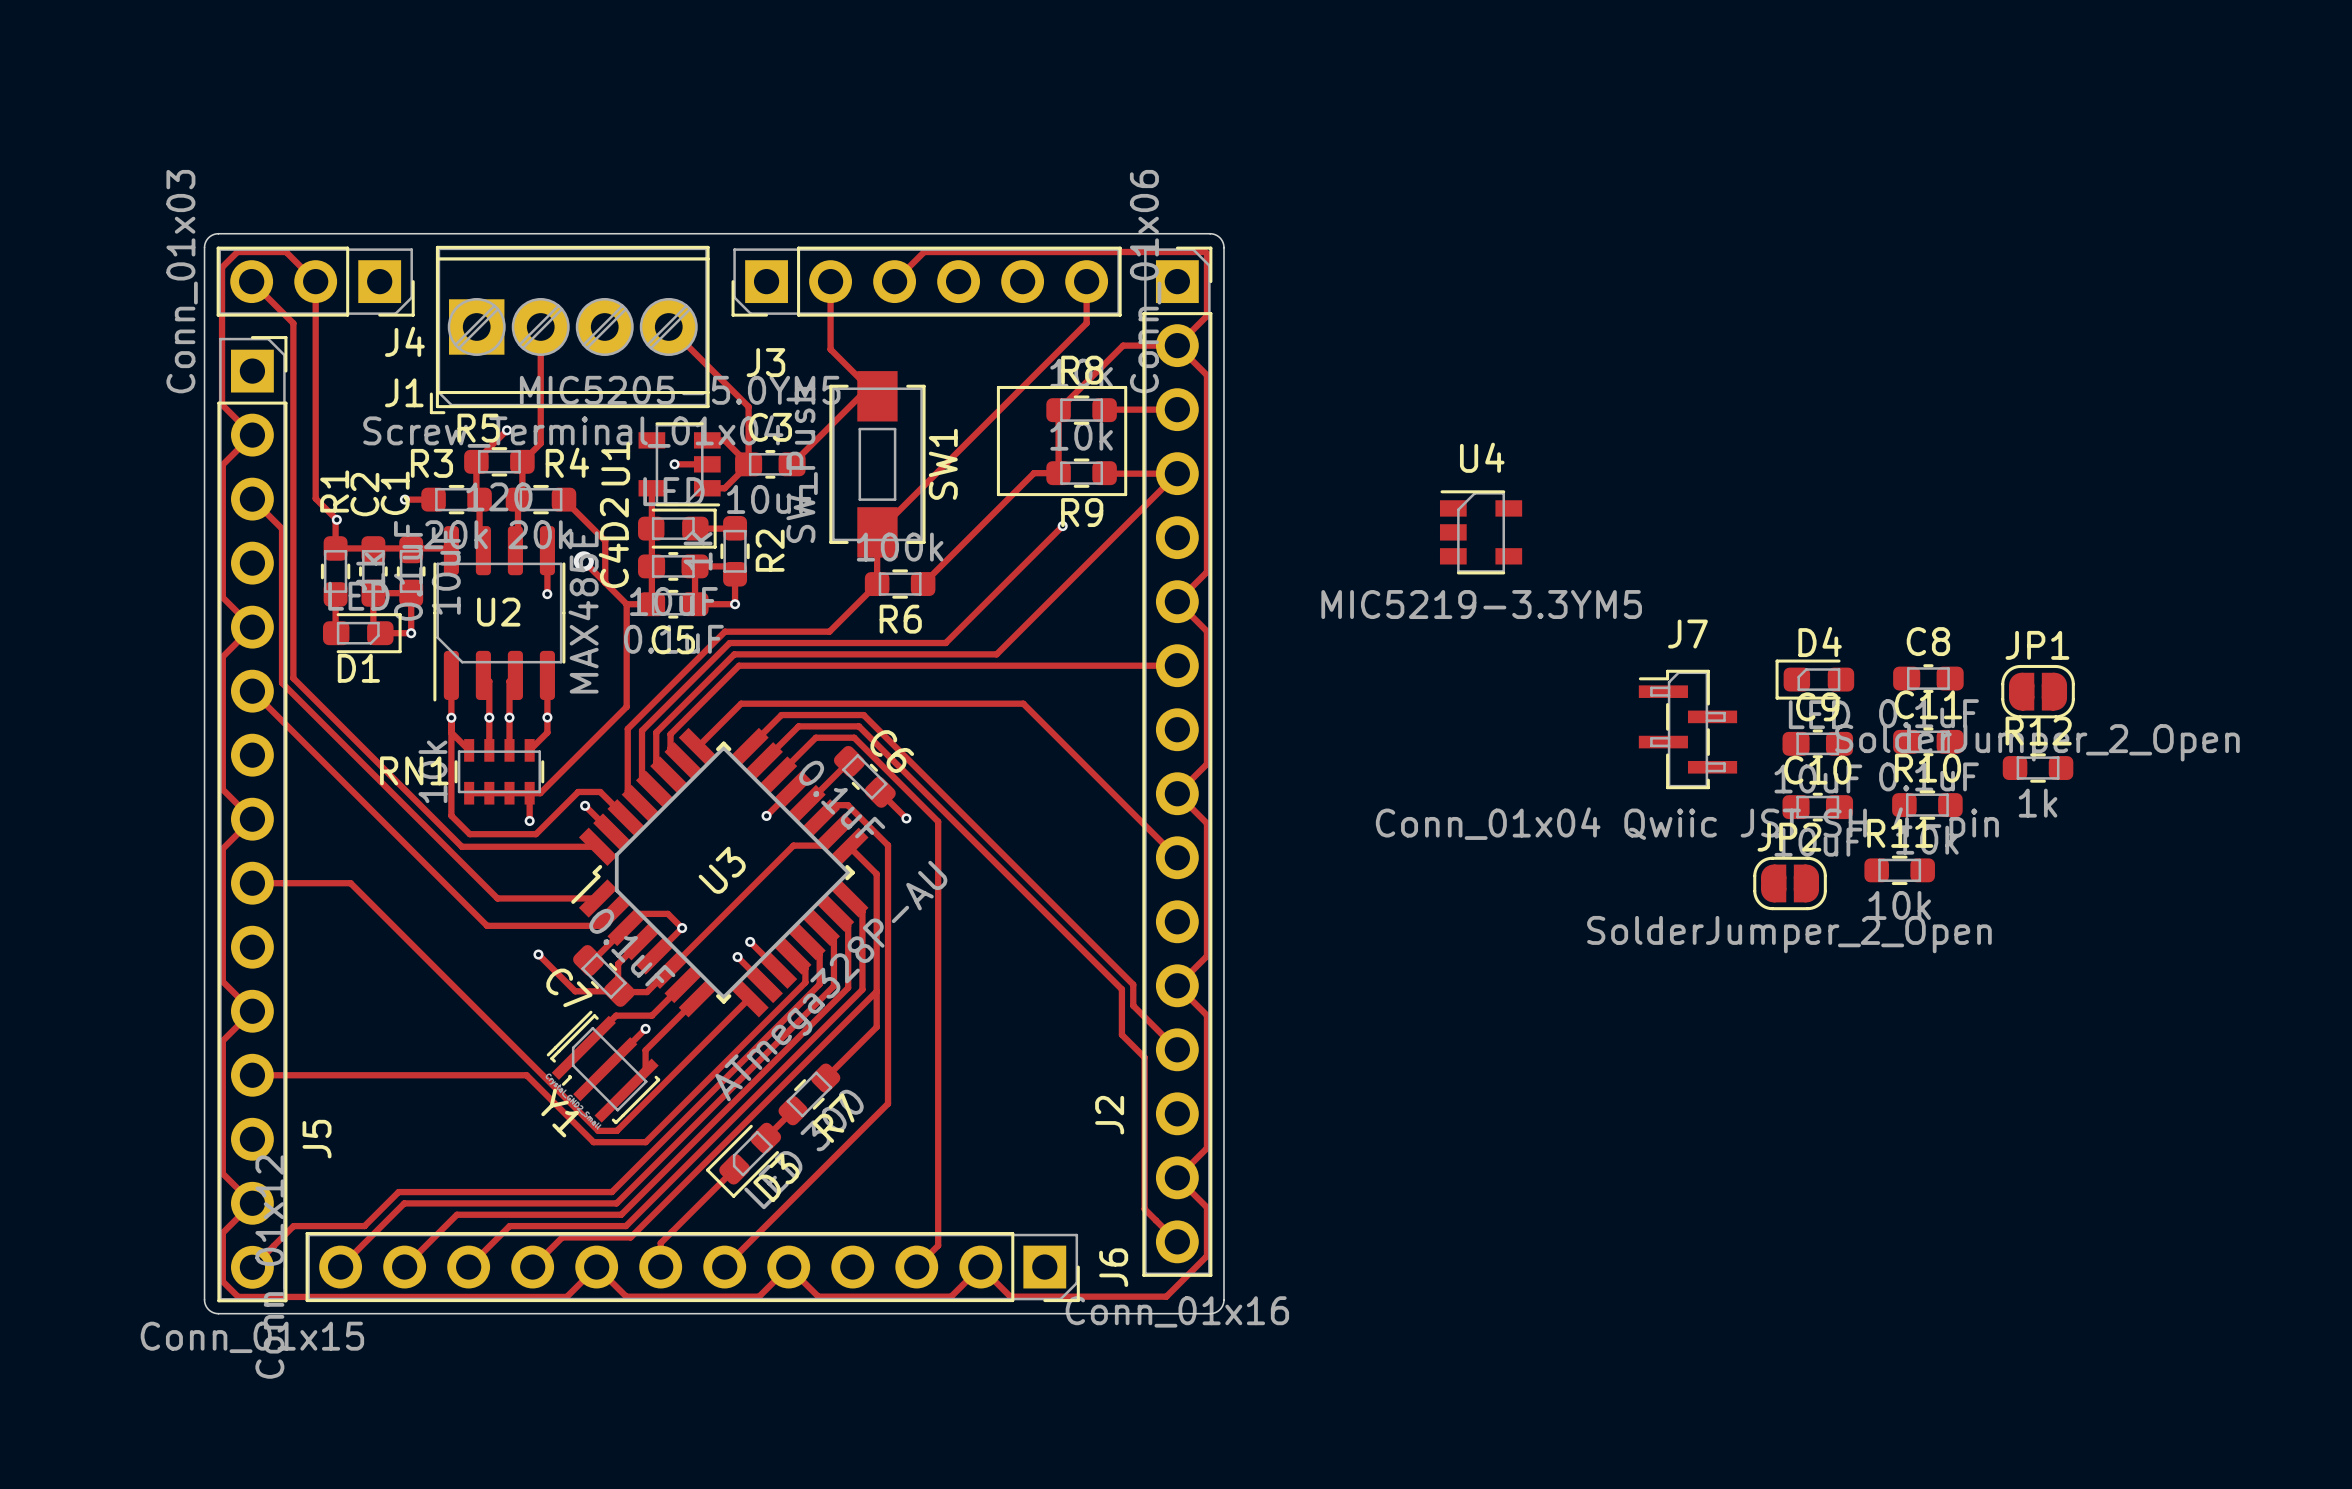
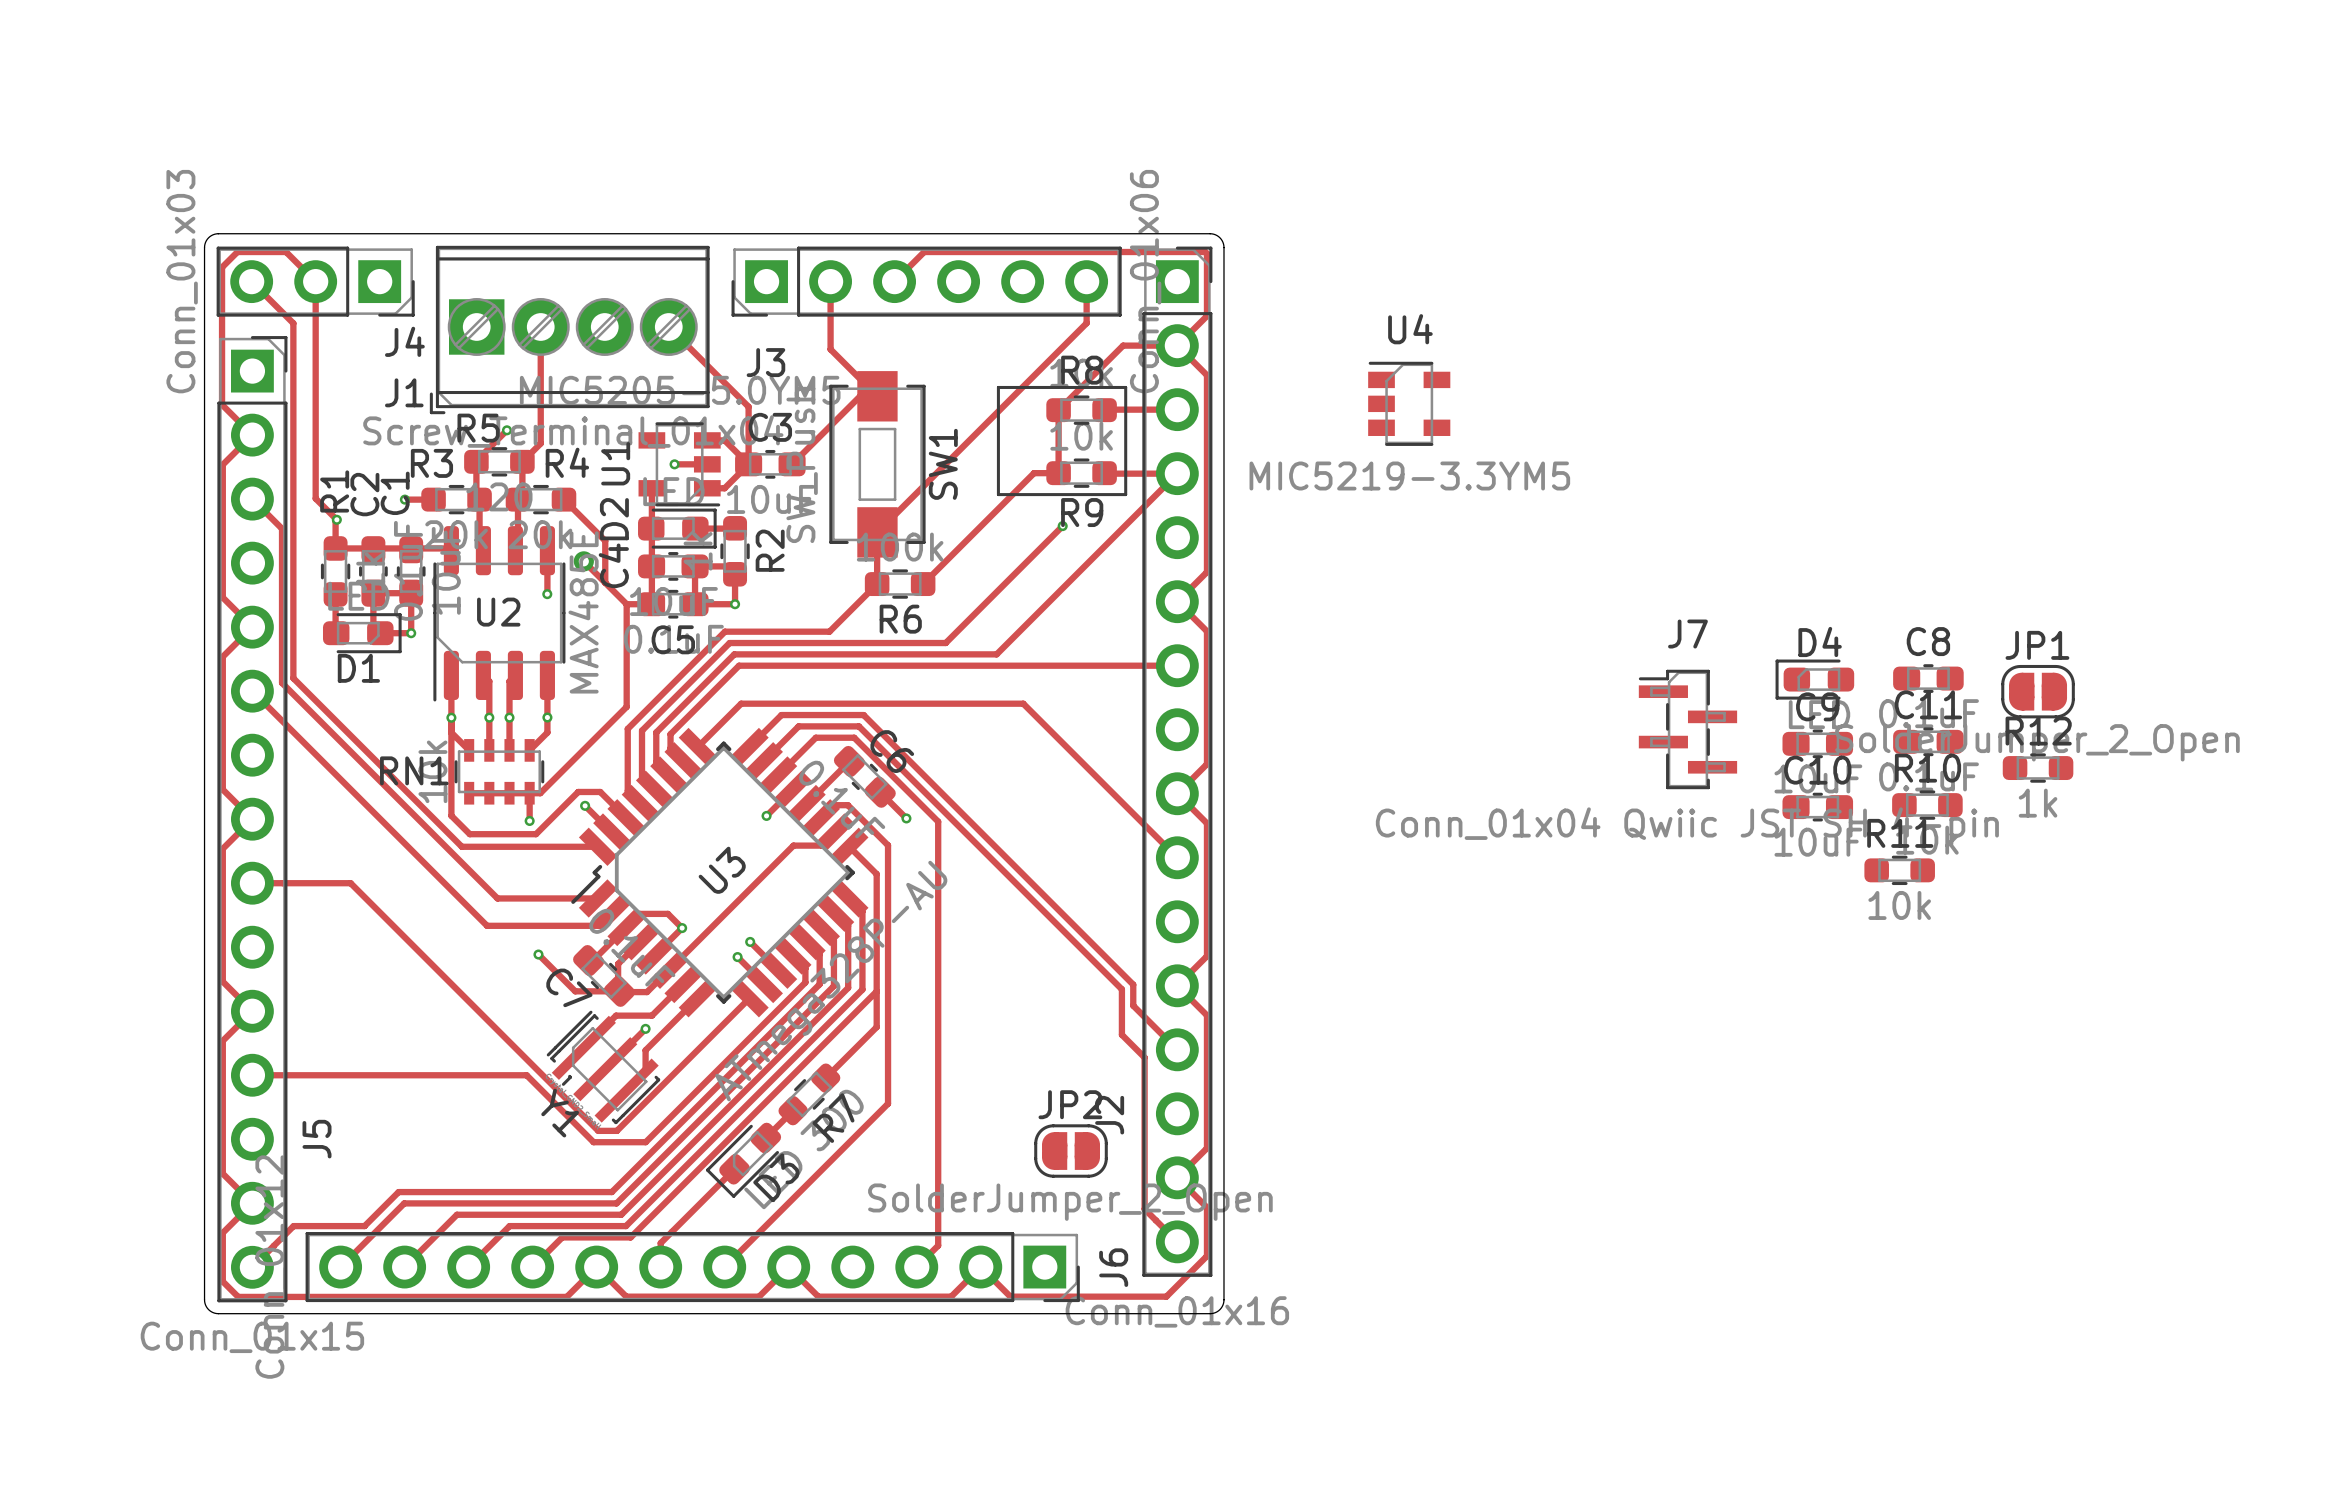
U4 position: (1481, 532) -> (1409, 403)
JP2 position: (1790, 883) -> (1071, 1151)

